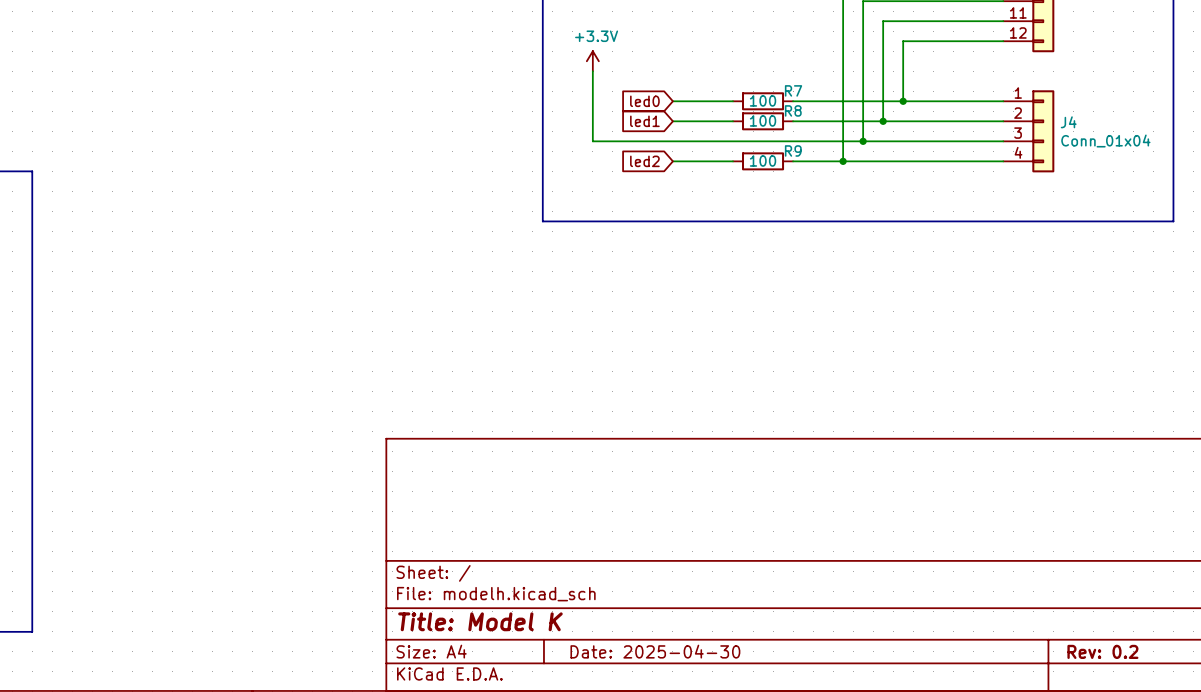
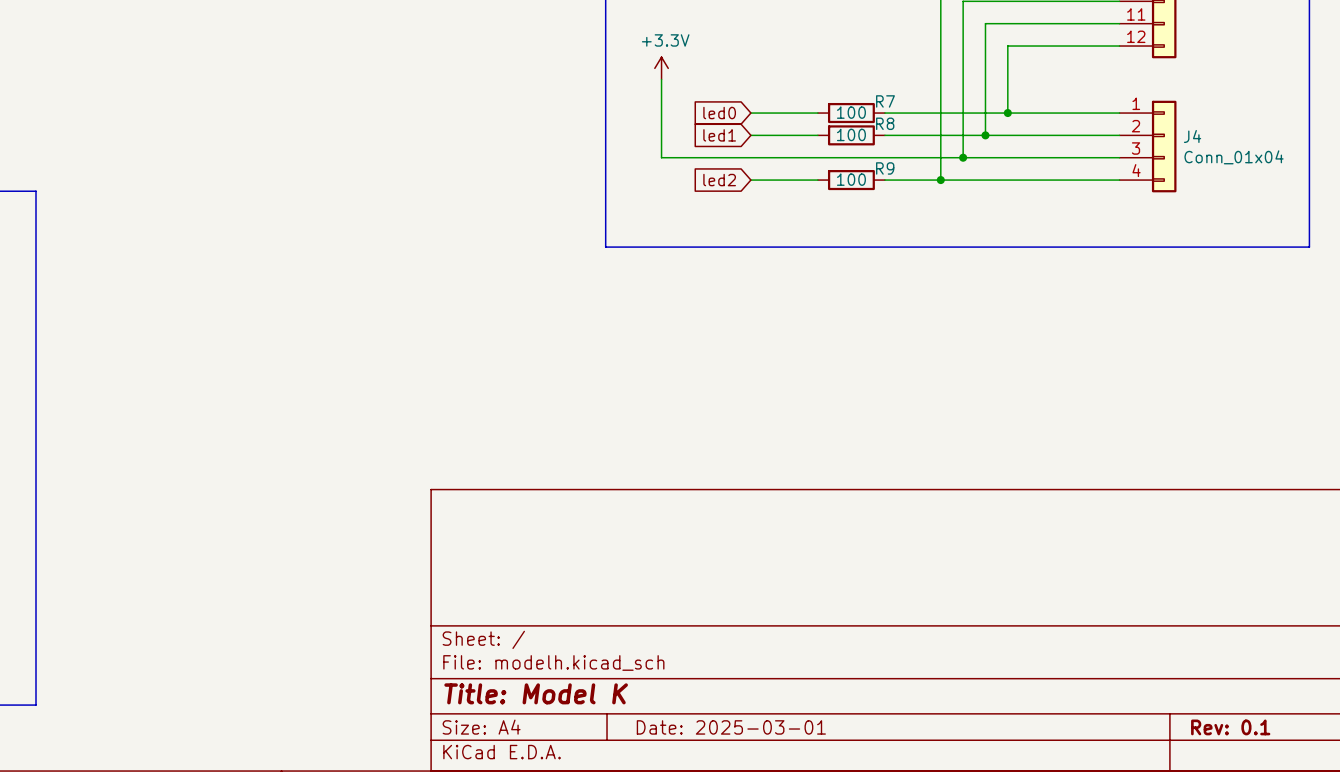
title block: Date: 2025-04-30 (655, 651) -> Date: 2025-03-01 (731, 727)
title block: Rev: 0.2 (1102, 651) -> Rev: 0.1 (1230, 727)

